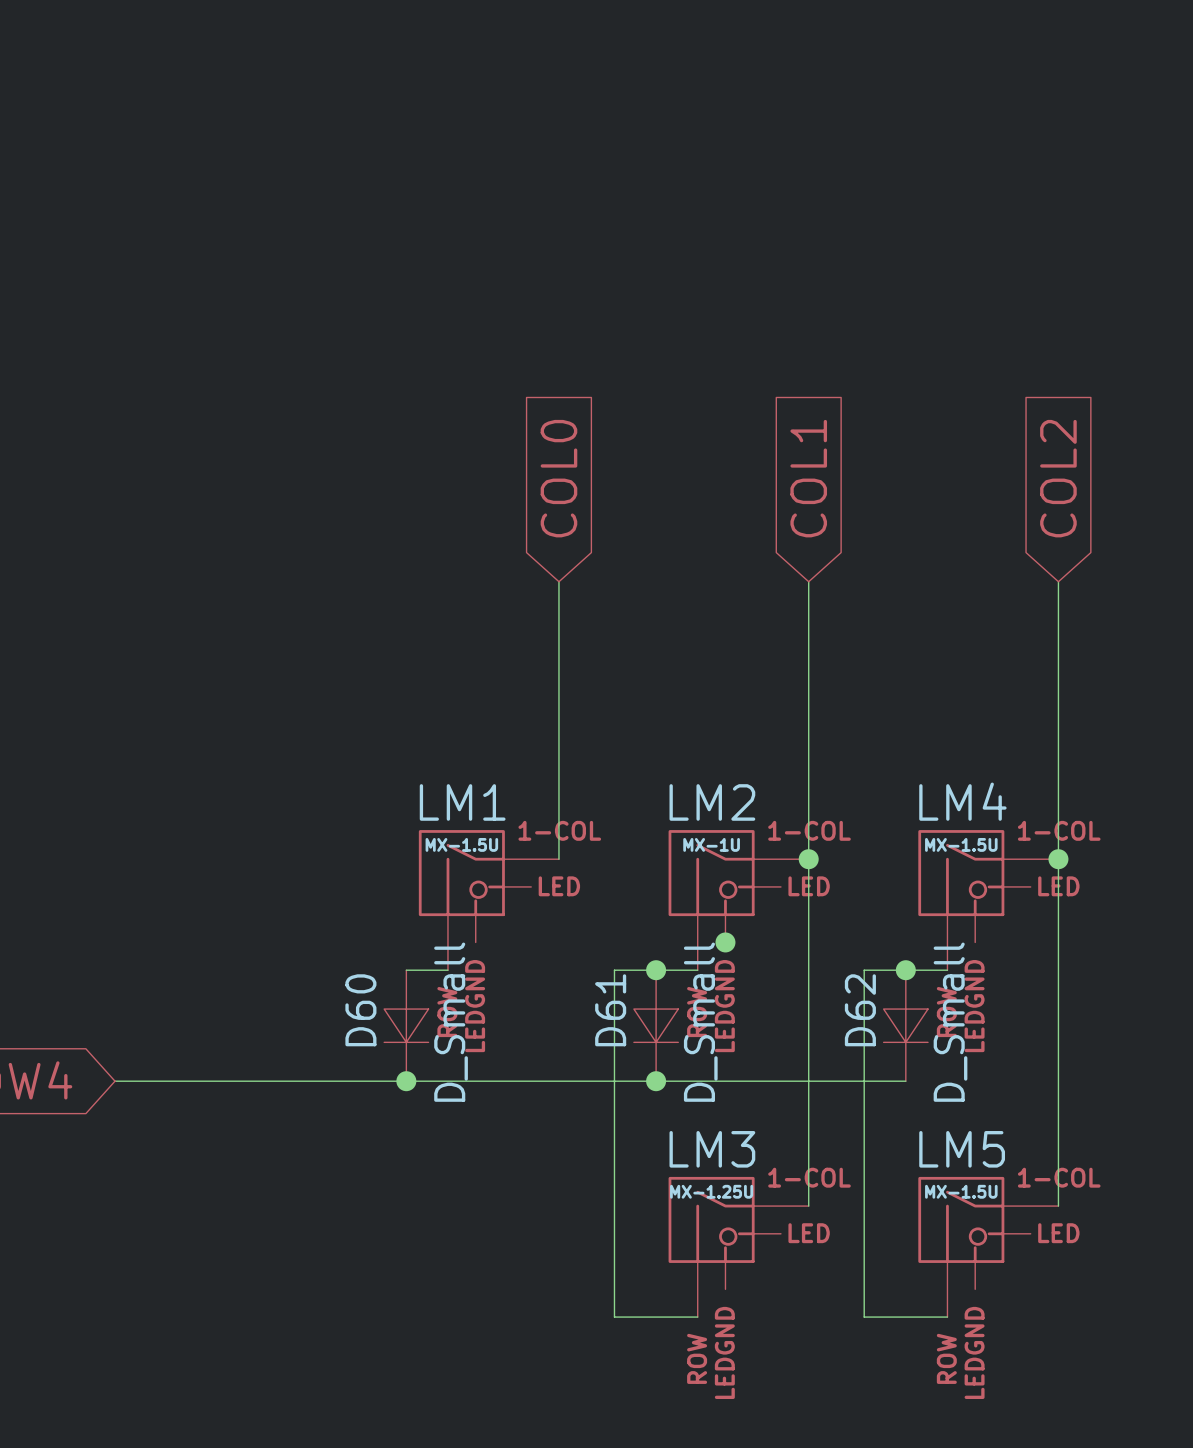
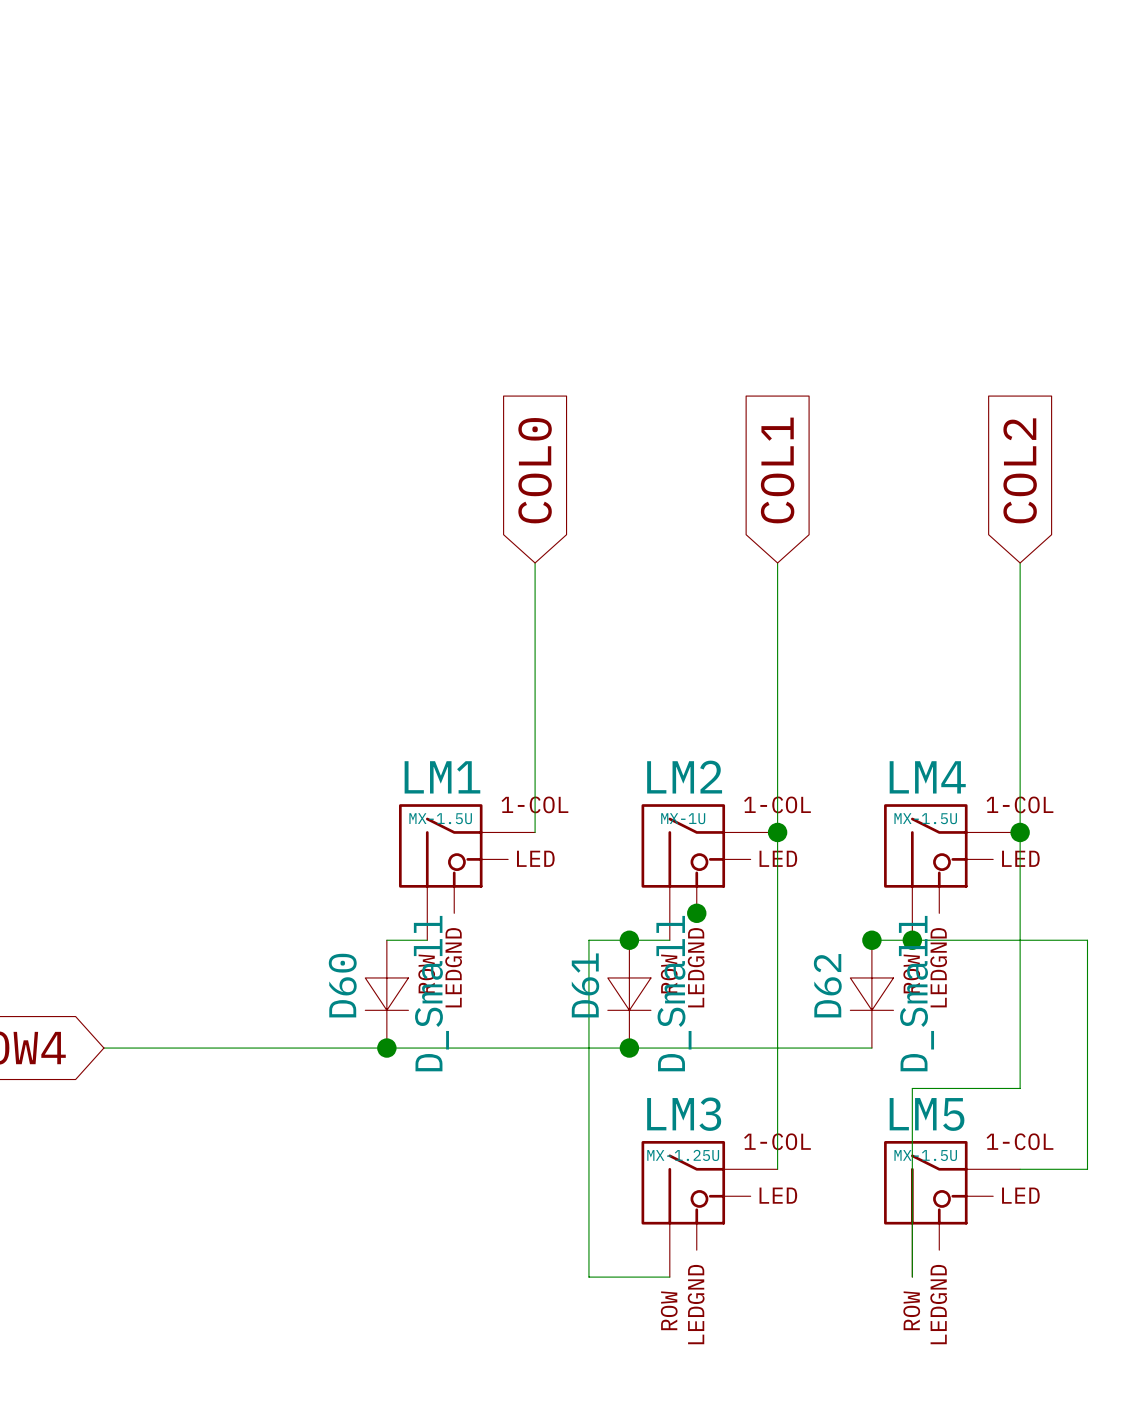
wire: (905, 970) (864, 970) (864, 1317) (947, 1317) -> none
wire: none -> (912, 940) (1087, 940) (1087, 1169) (1020, 1169)
junction: none -> (912, 940)
wire: (1058, 1122) (1058, 1206) -> (1020, 1088) (912, 1088) (912, 1277)

